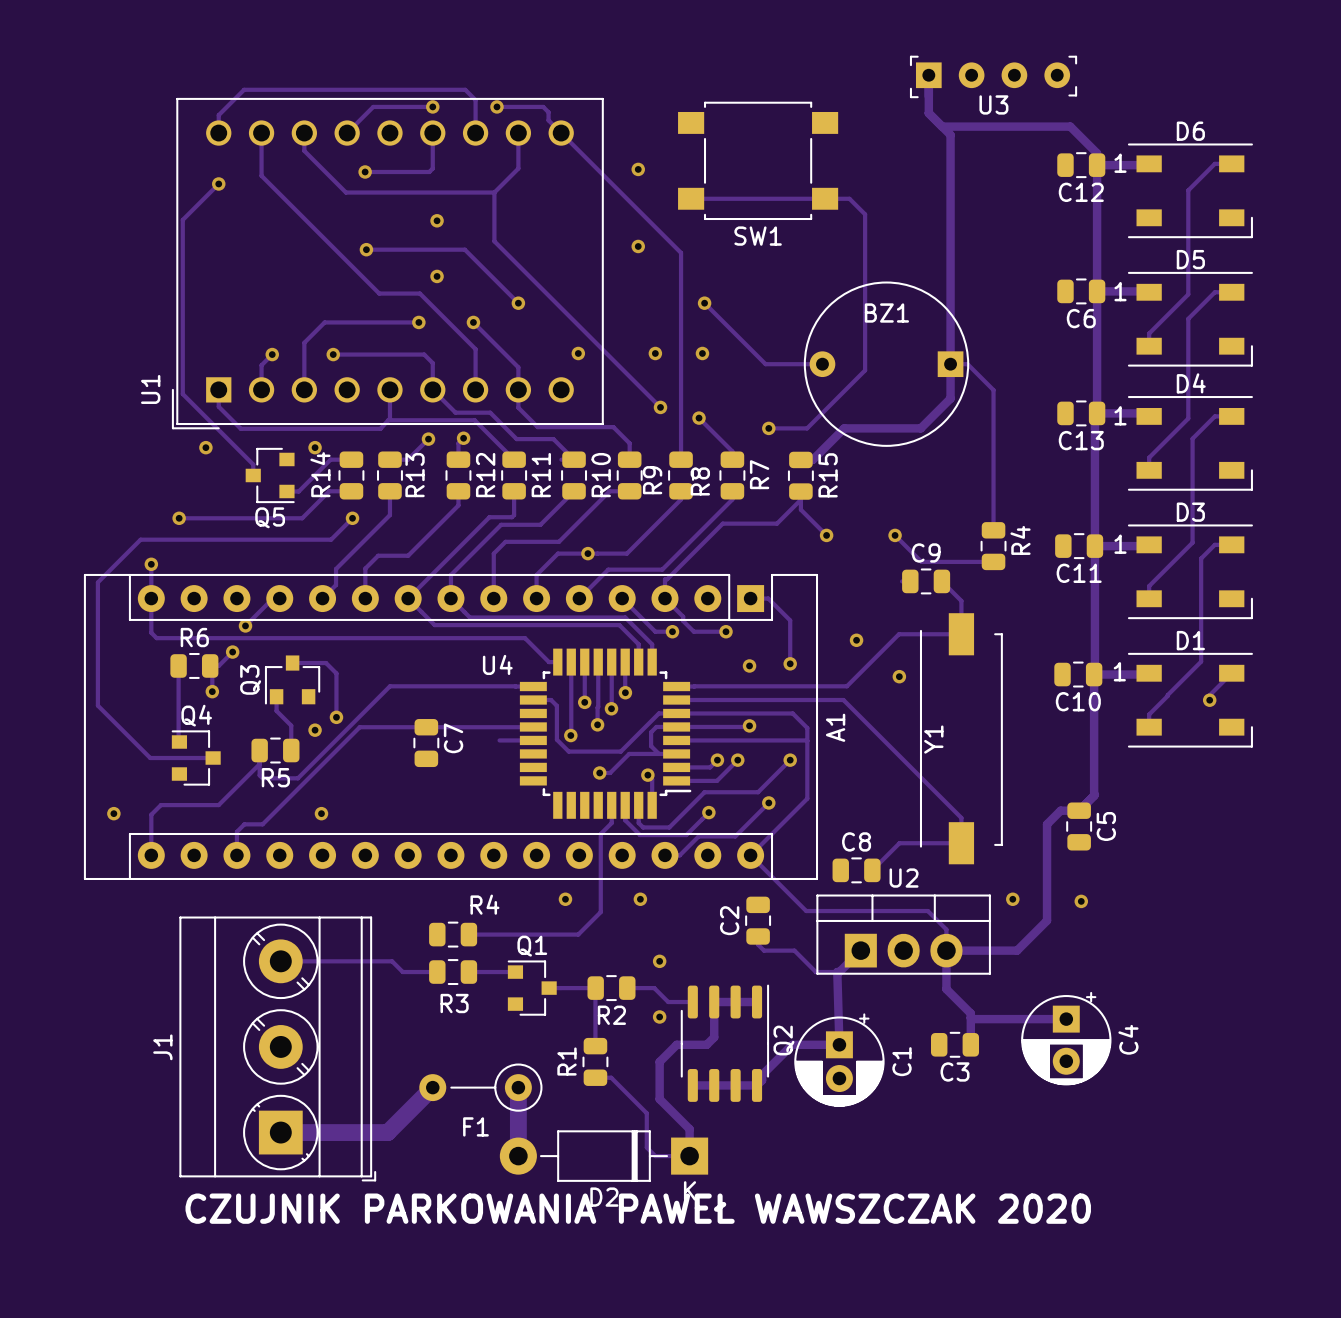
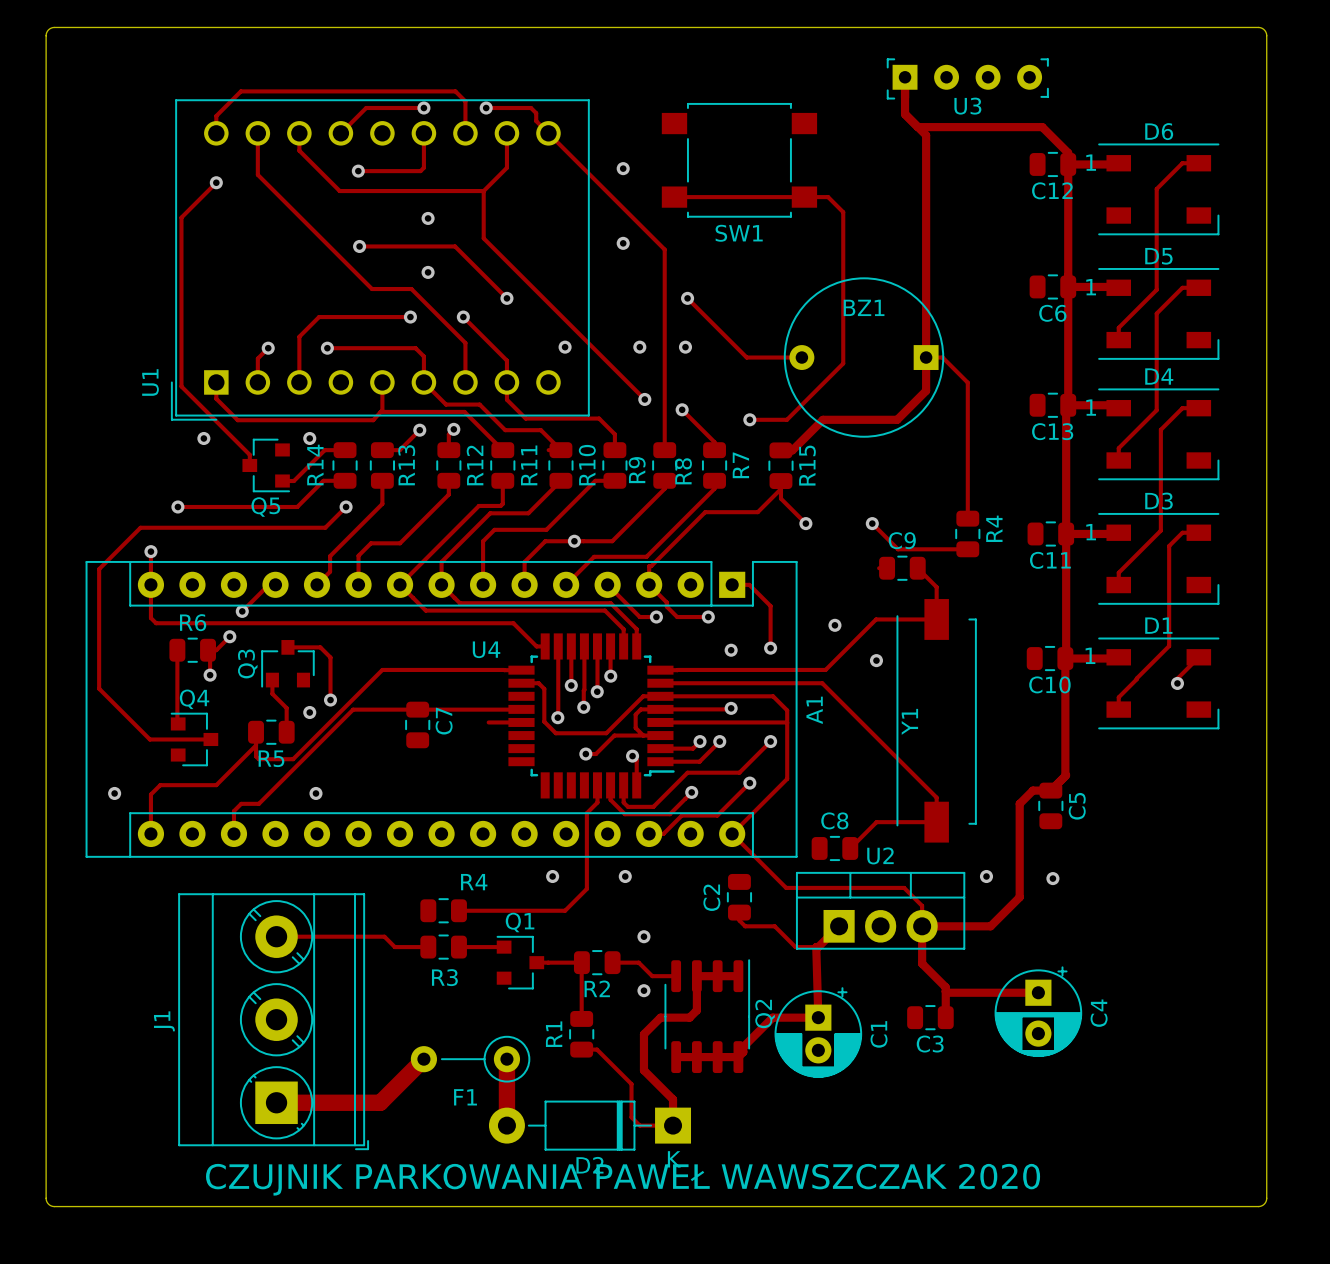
board edge: none -> (54, 27) (1258, 27) (1264, 29) (1266, 35) (1266, 1198) (1264, 1204) (1258, 1206) (54, 1206) (48, 1204) (46, 1198) (46, 35) (48, 29) (54, 27)

